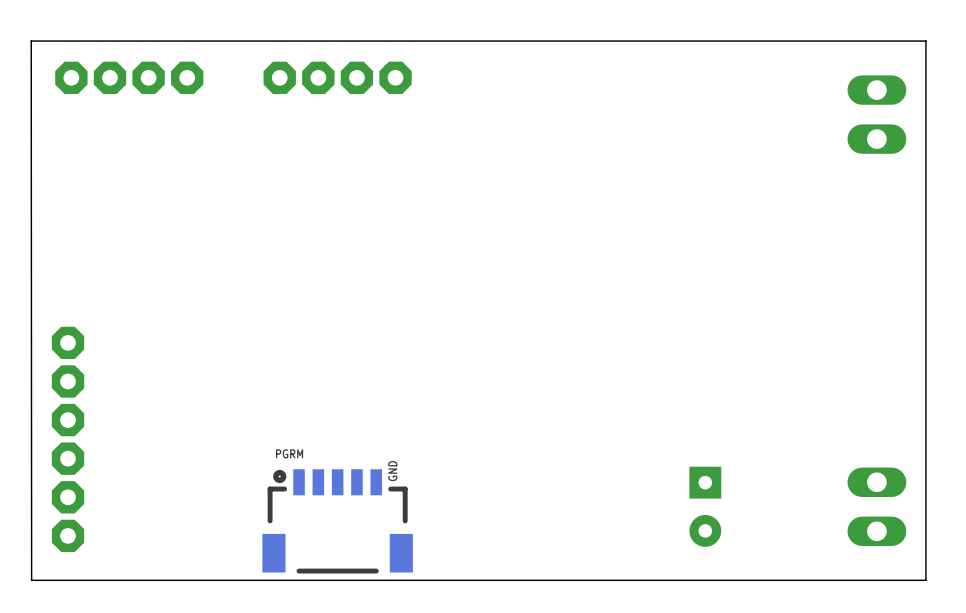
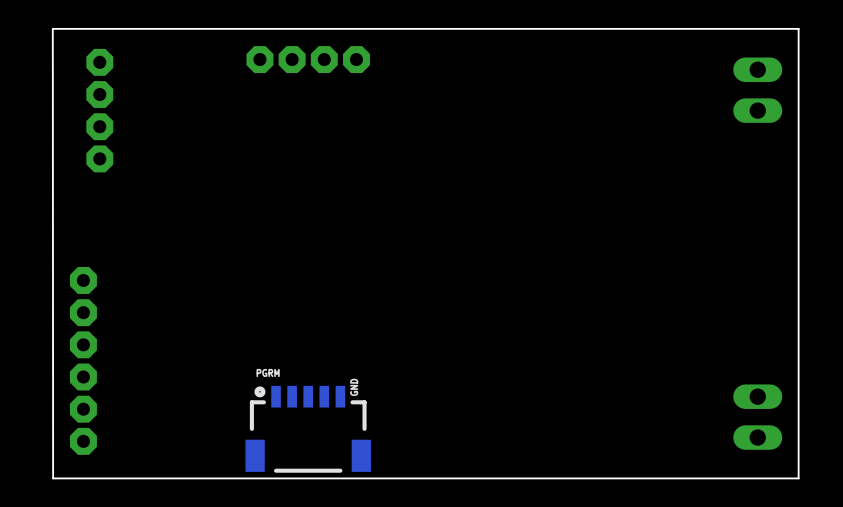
part rotation: 0° (129, 77) -> 90° clockwise (99, 110)
part: (705, 506) -> none

